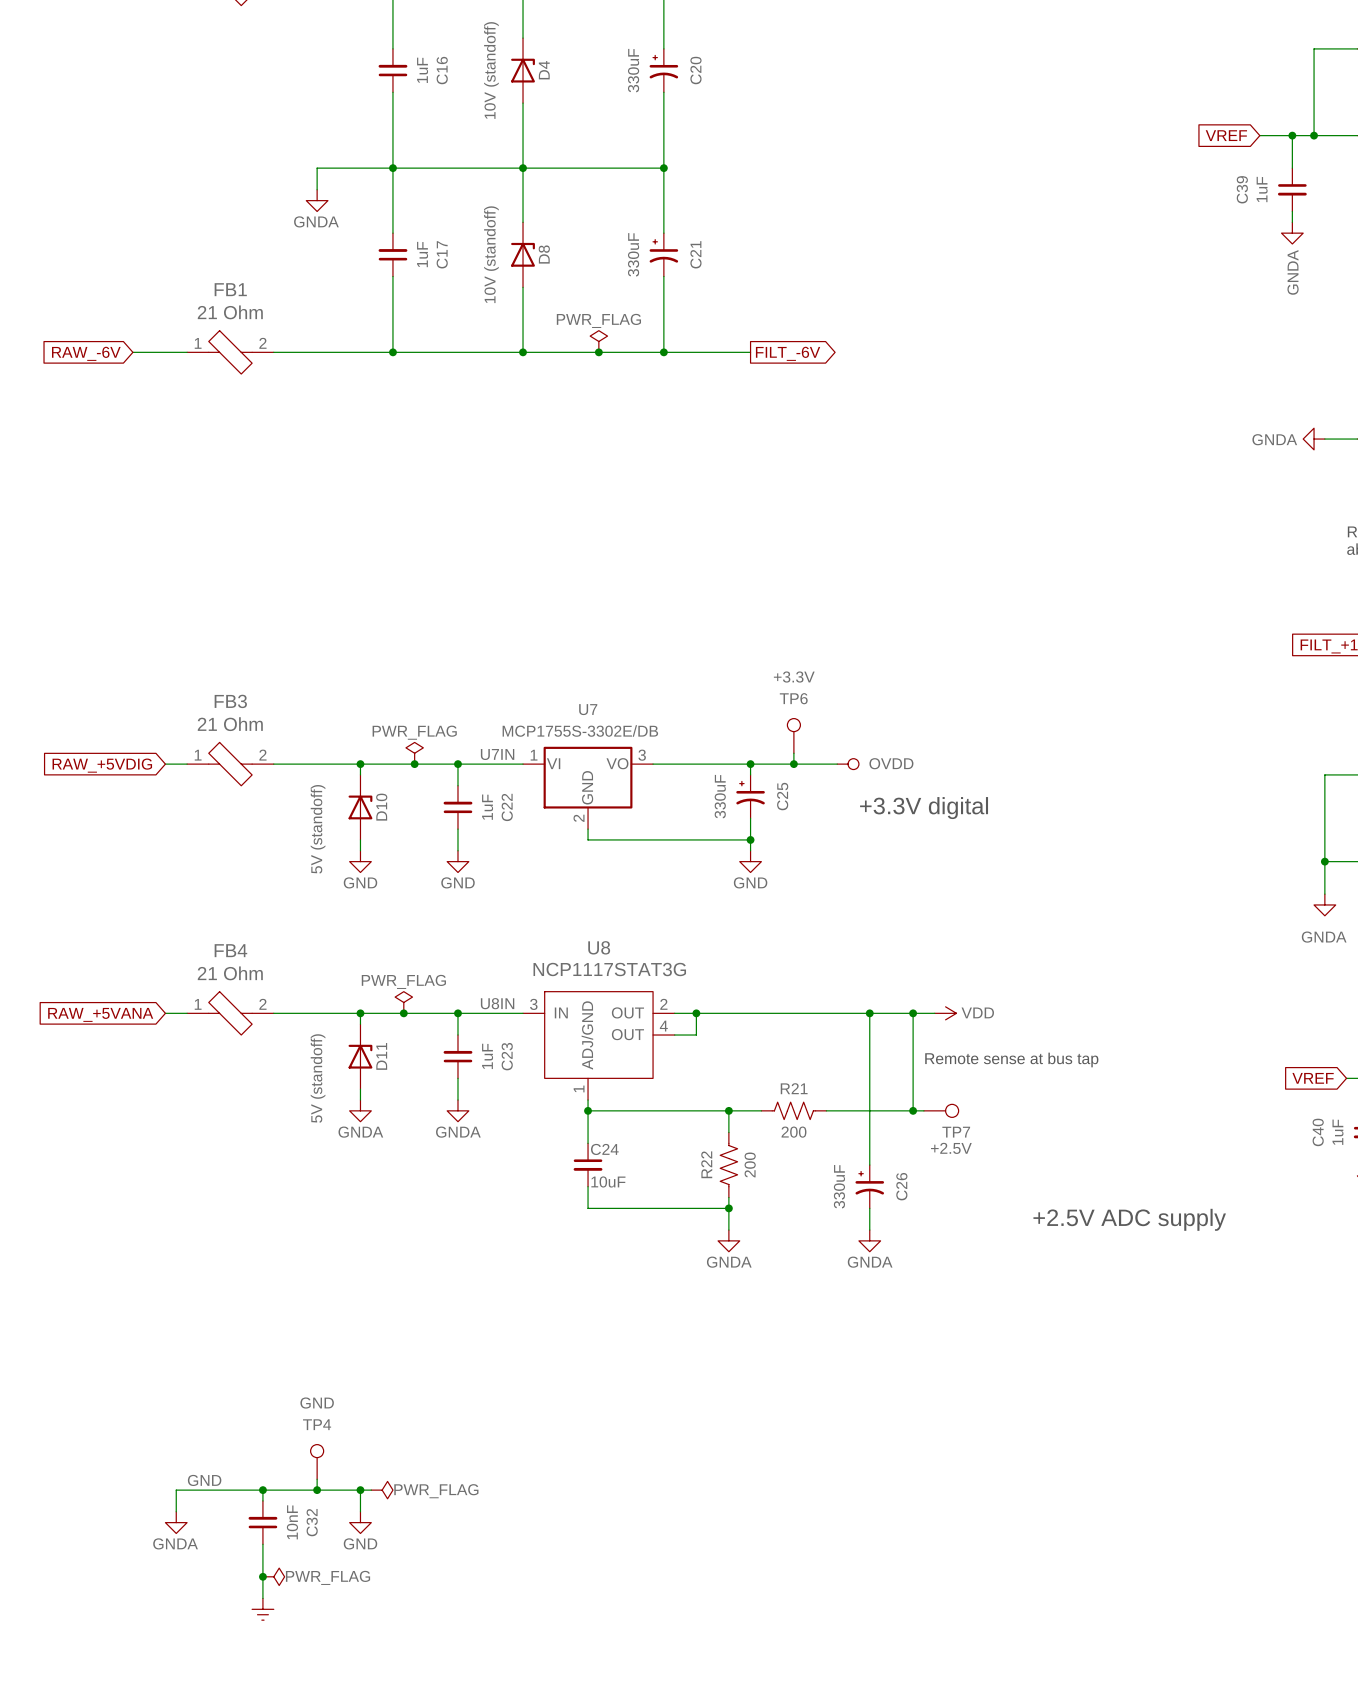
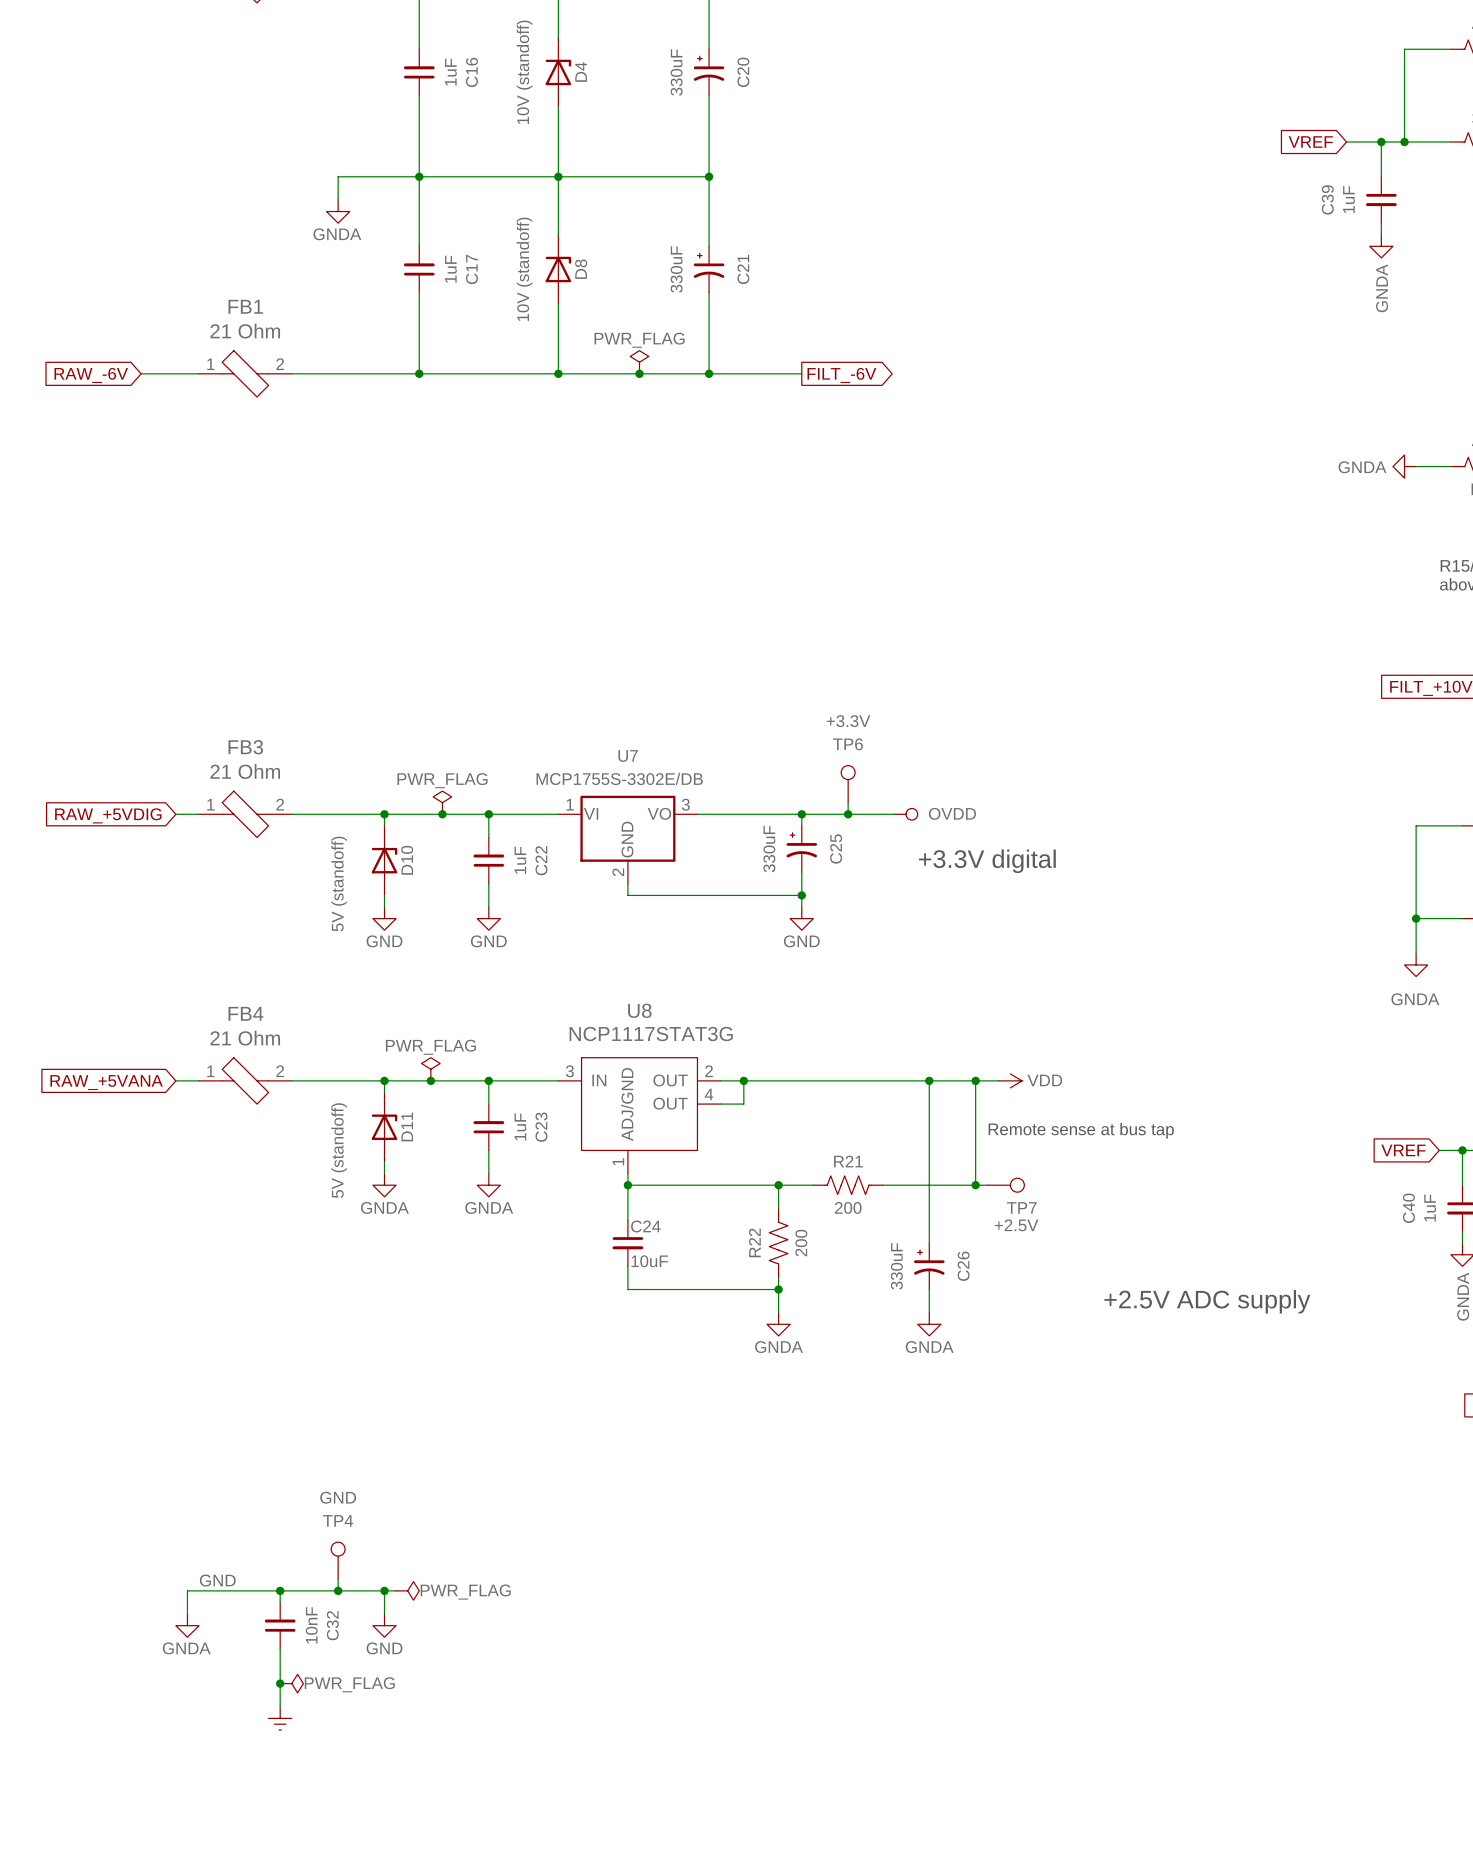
label: U7IN (497, 754) -> none
label: U8IN (497, 1003) -> none

